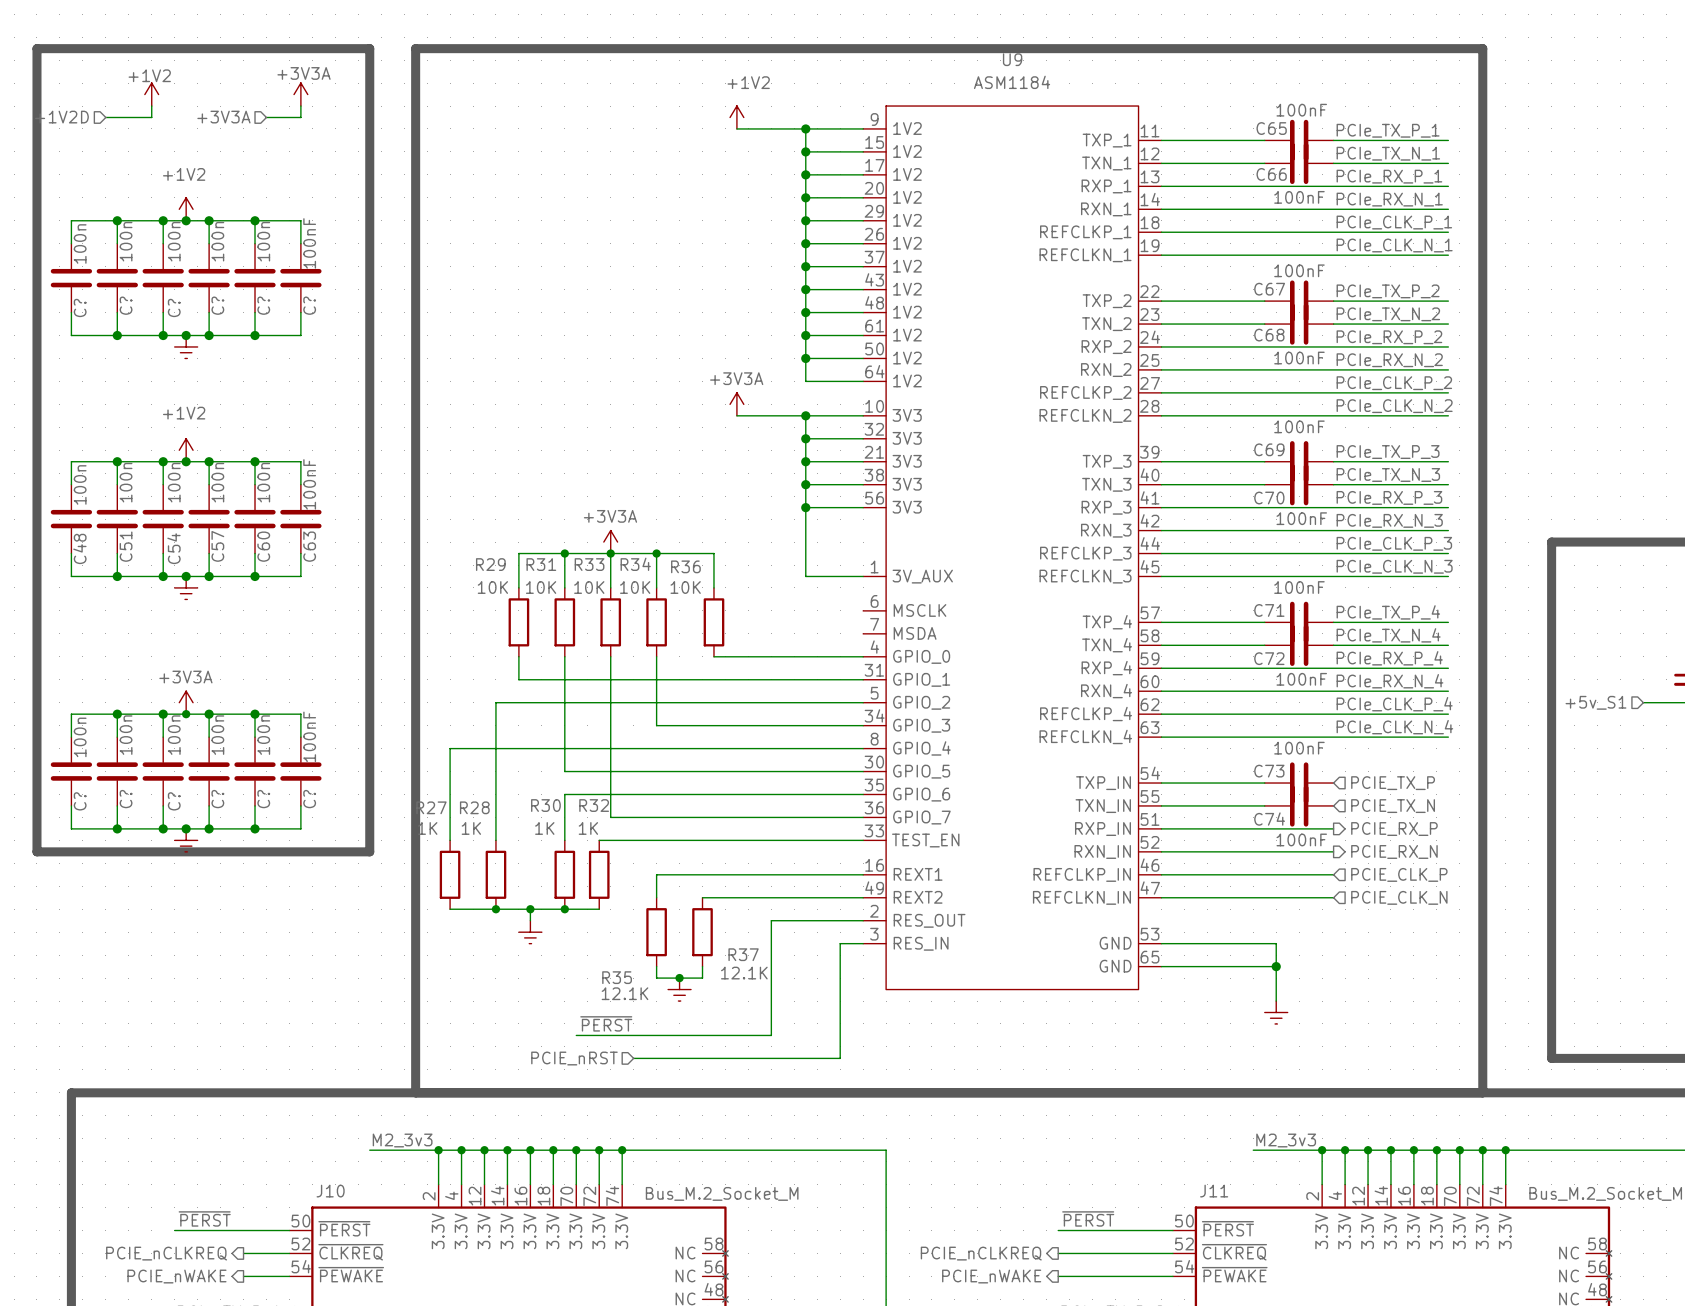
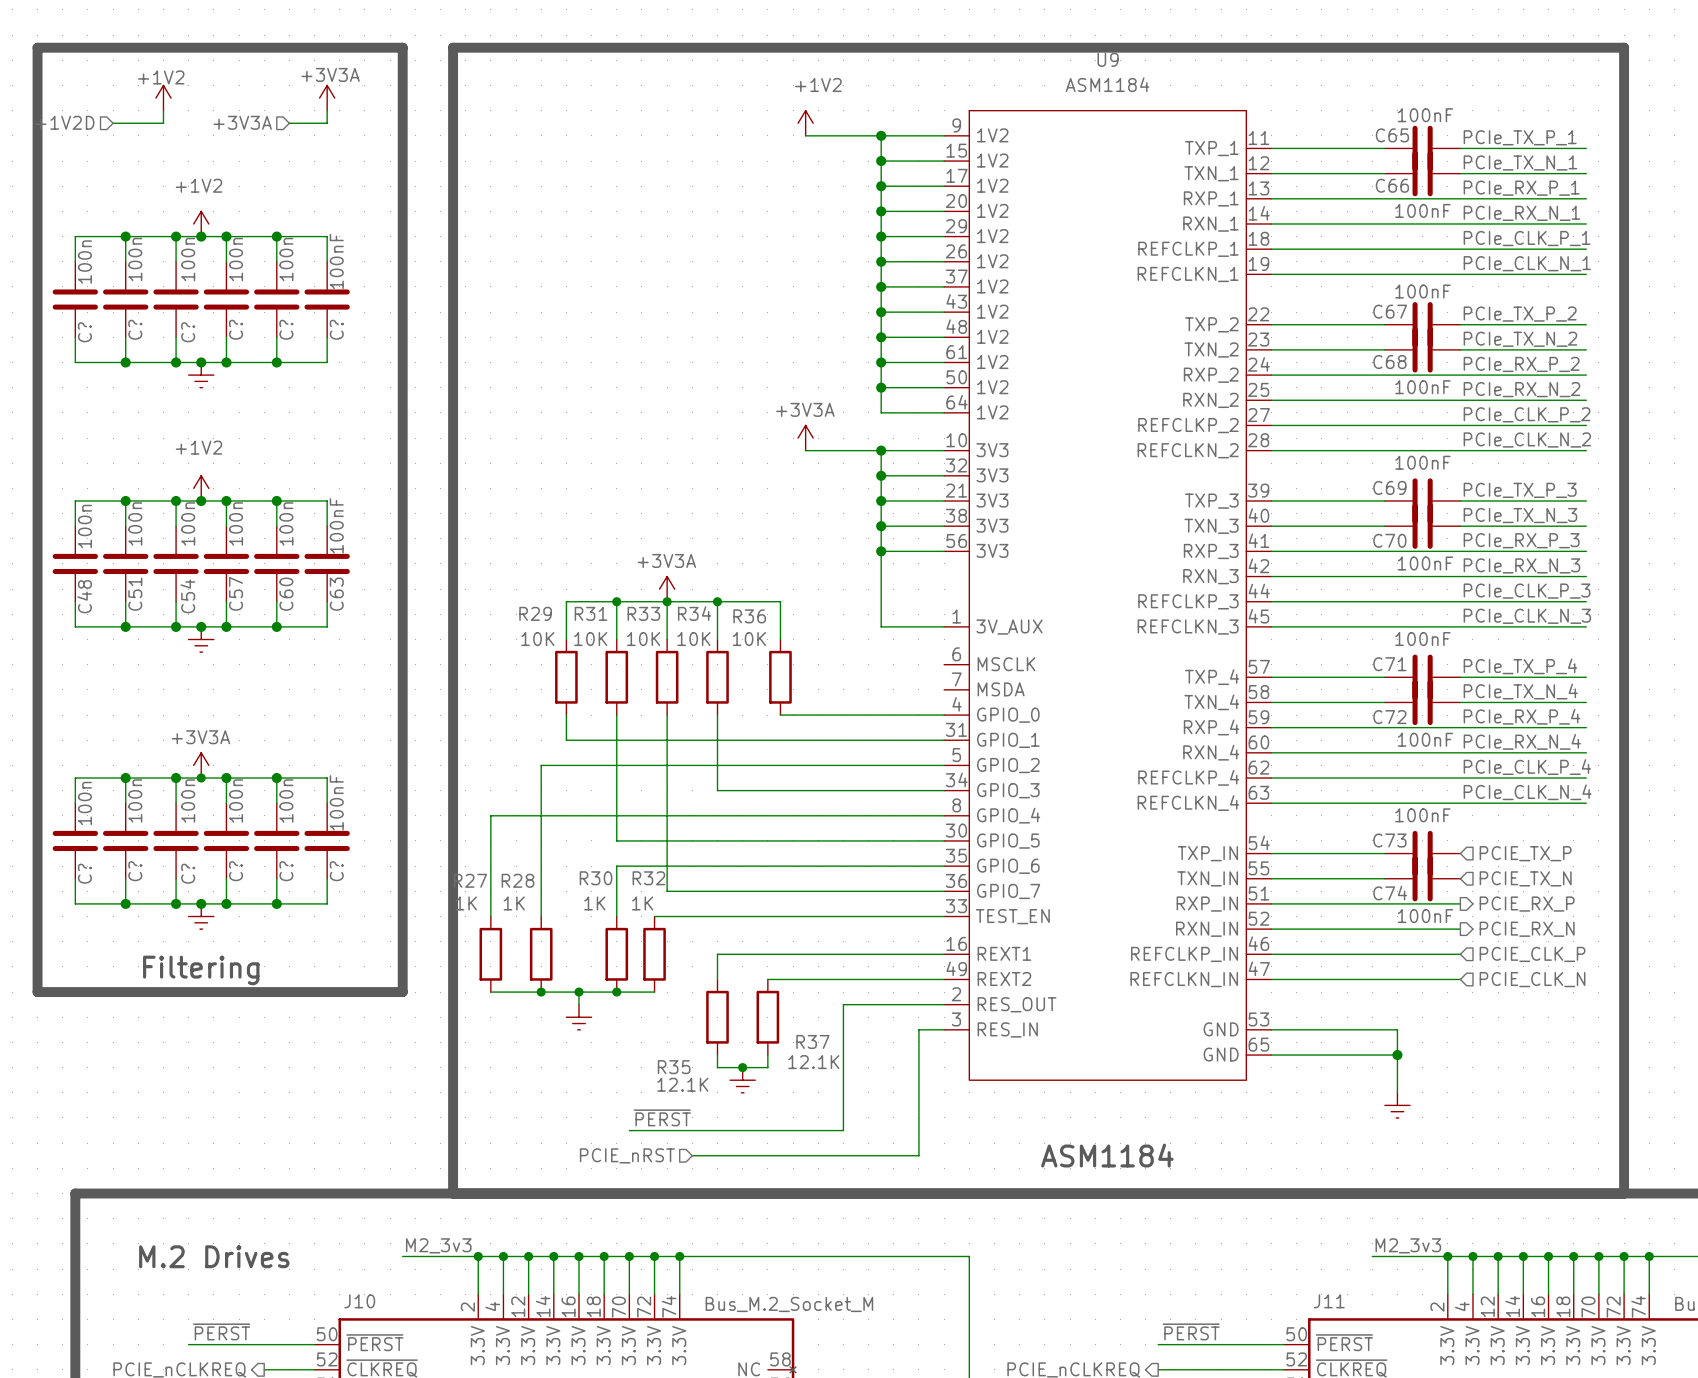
line: (36, 851) (369, 851) -> (37, 929) (37, 992) (402, 992) (402, 929)
text: none -> Filtering (201, 970)
text: none -> ASM1184 (1107, 1155)
text: none -> M.2 Drives (214, 1256)

